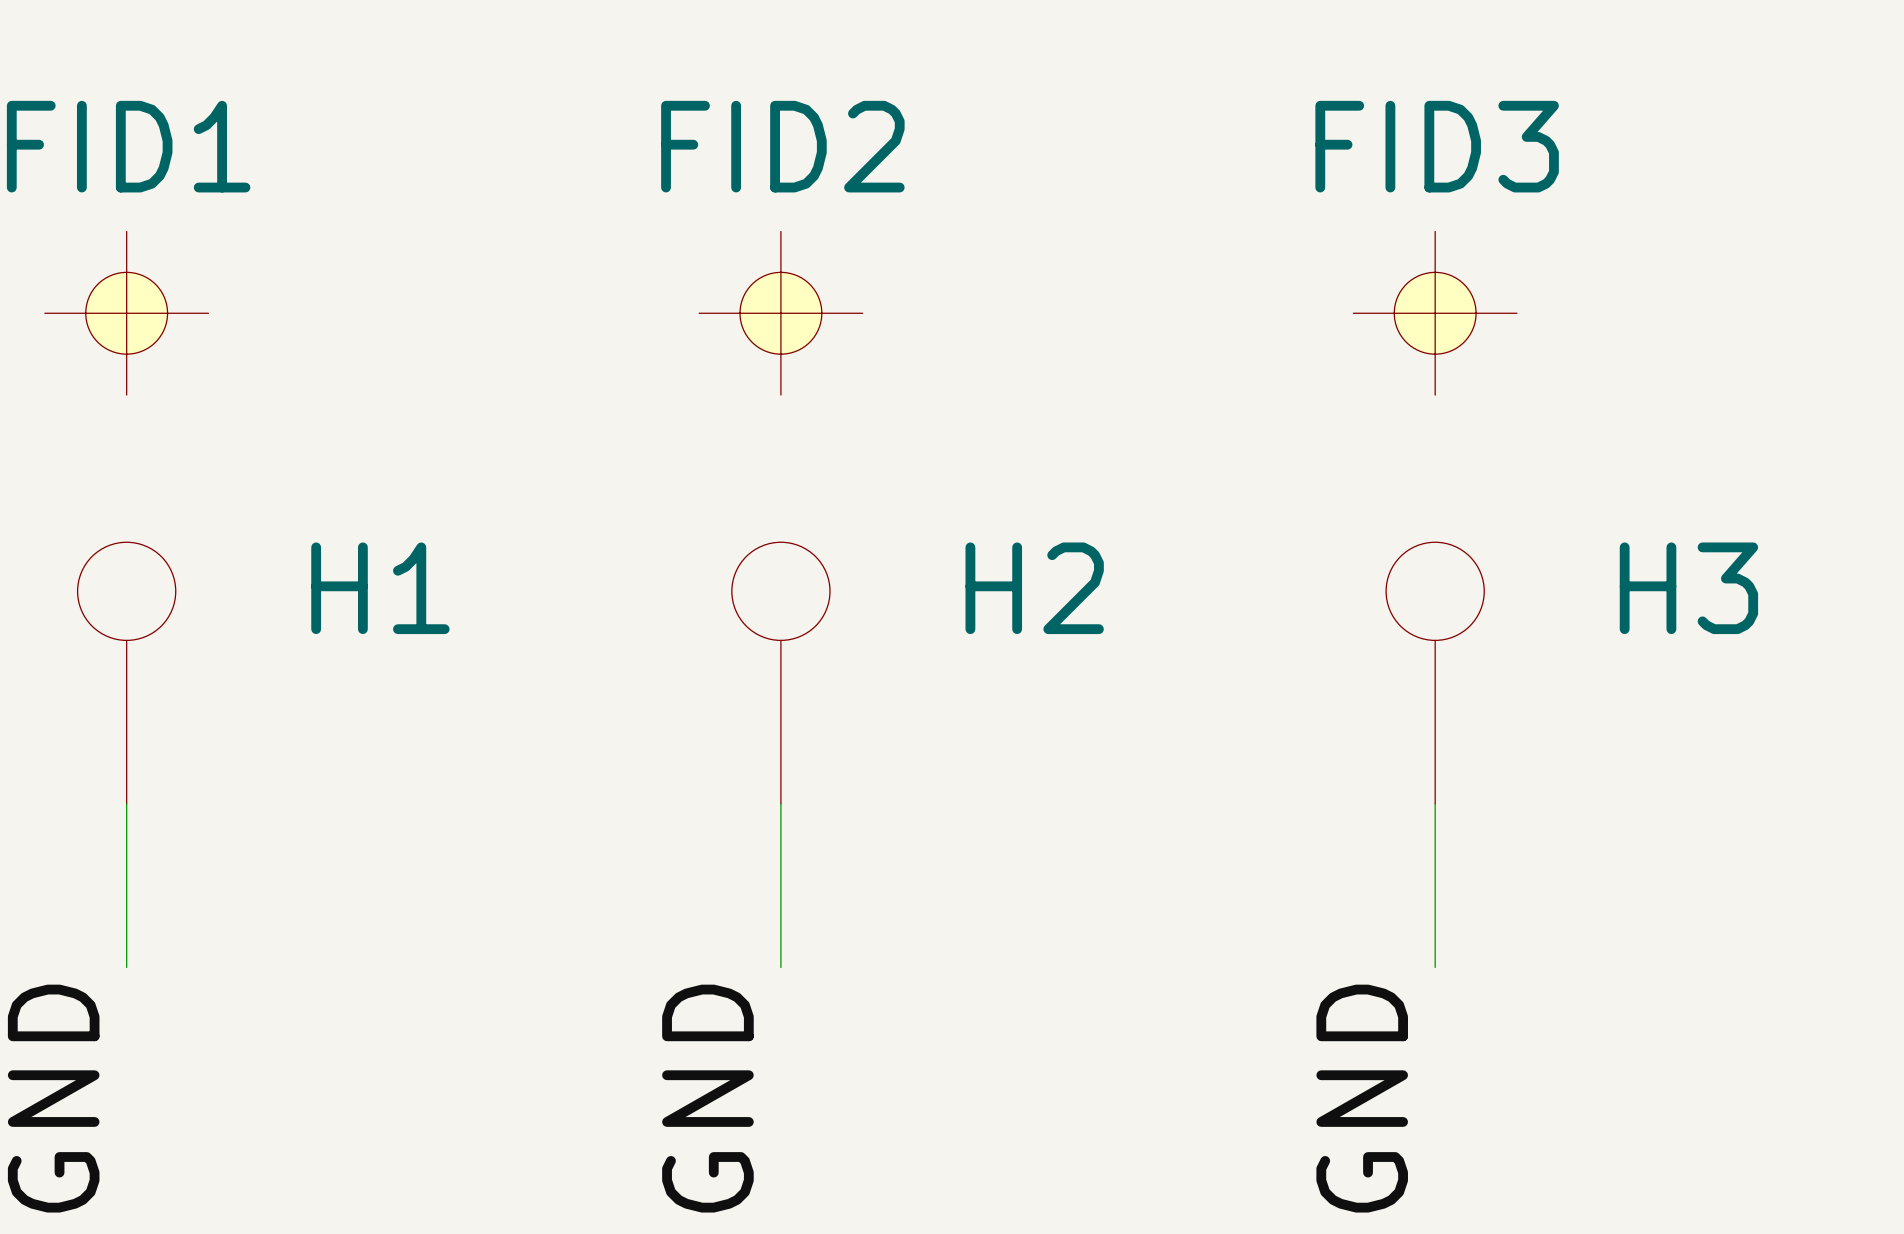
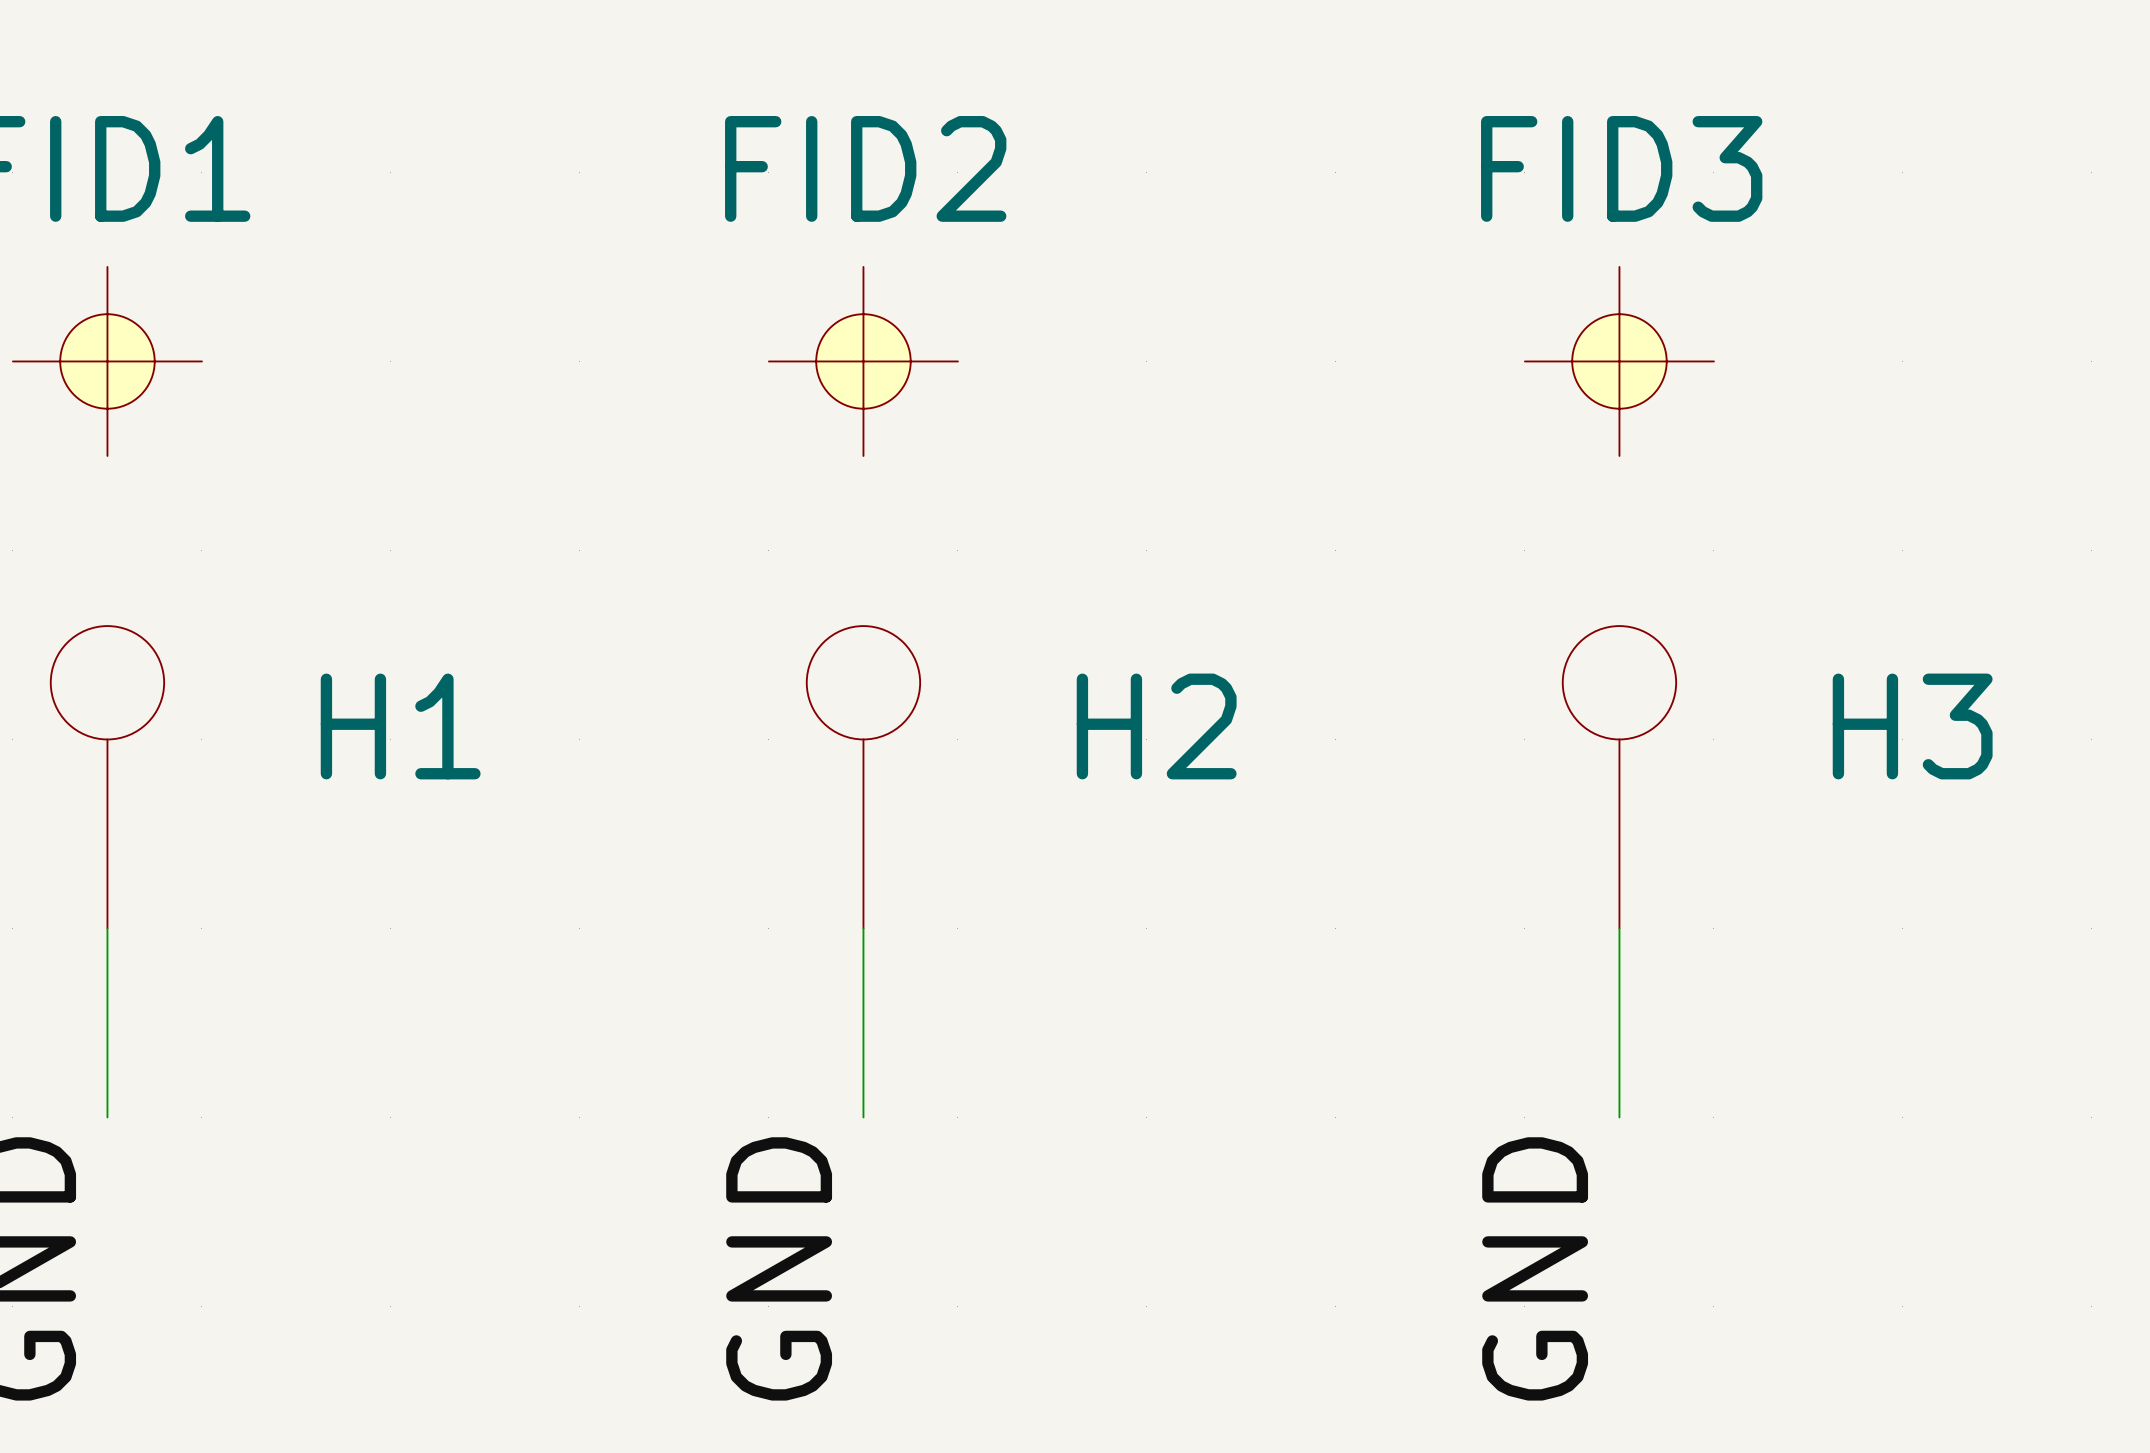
H1 name position: H1 (380, 588) -> H1 (400, 726)
H2 name position: H2 (1034, 588) -> H2 (1156, 726)
H3 name position: H3 (1688, 588) -> H3 (1912, 726)

